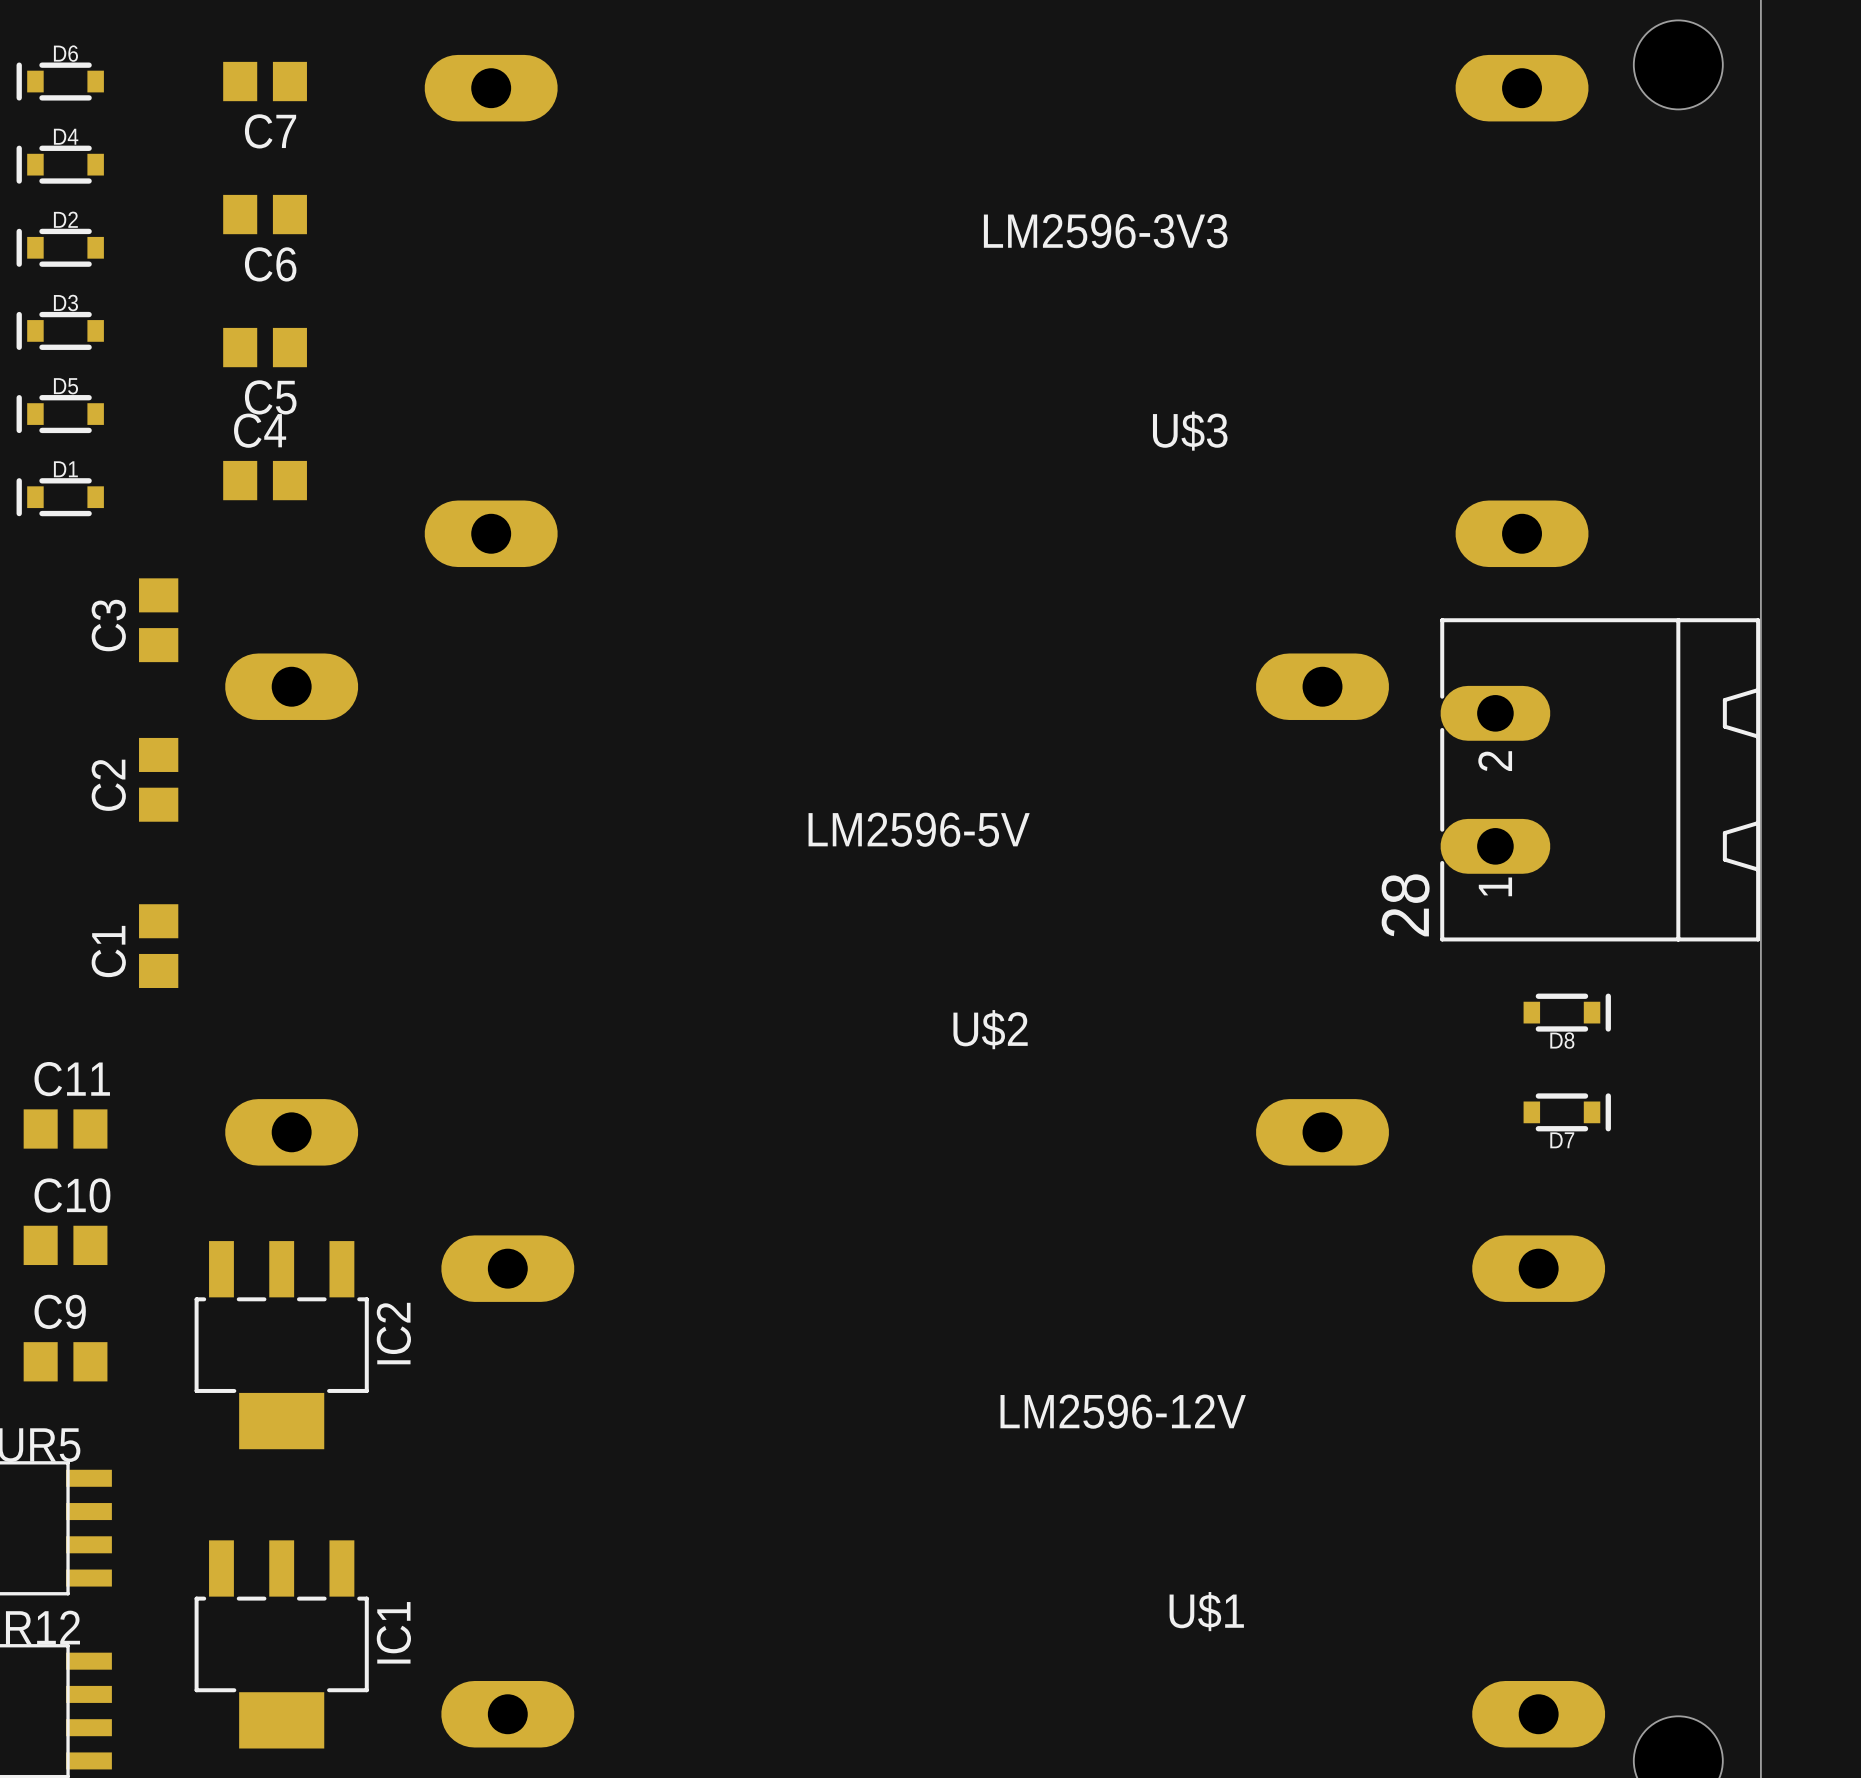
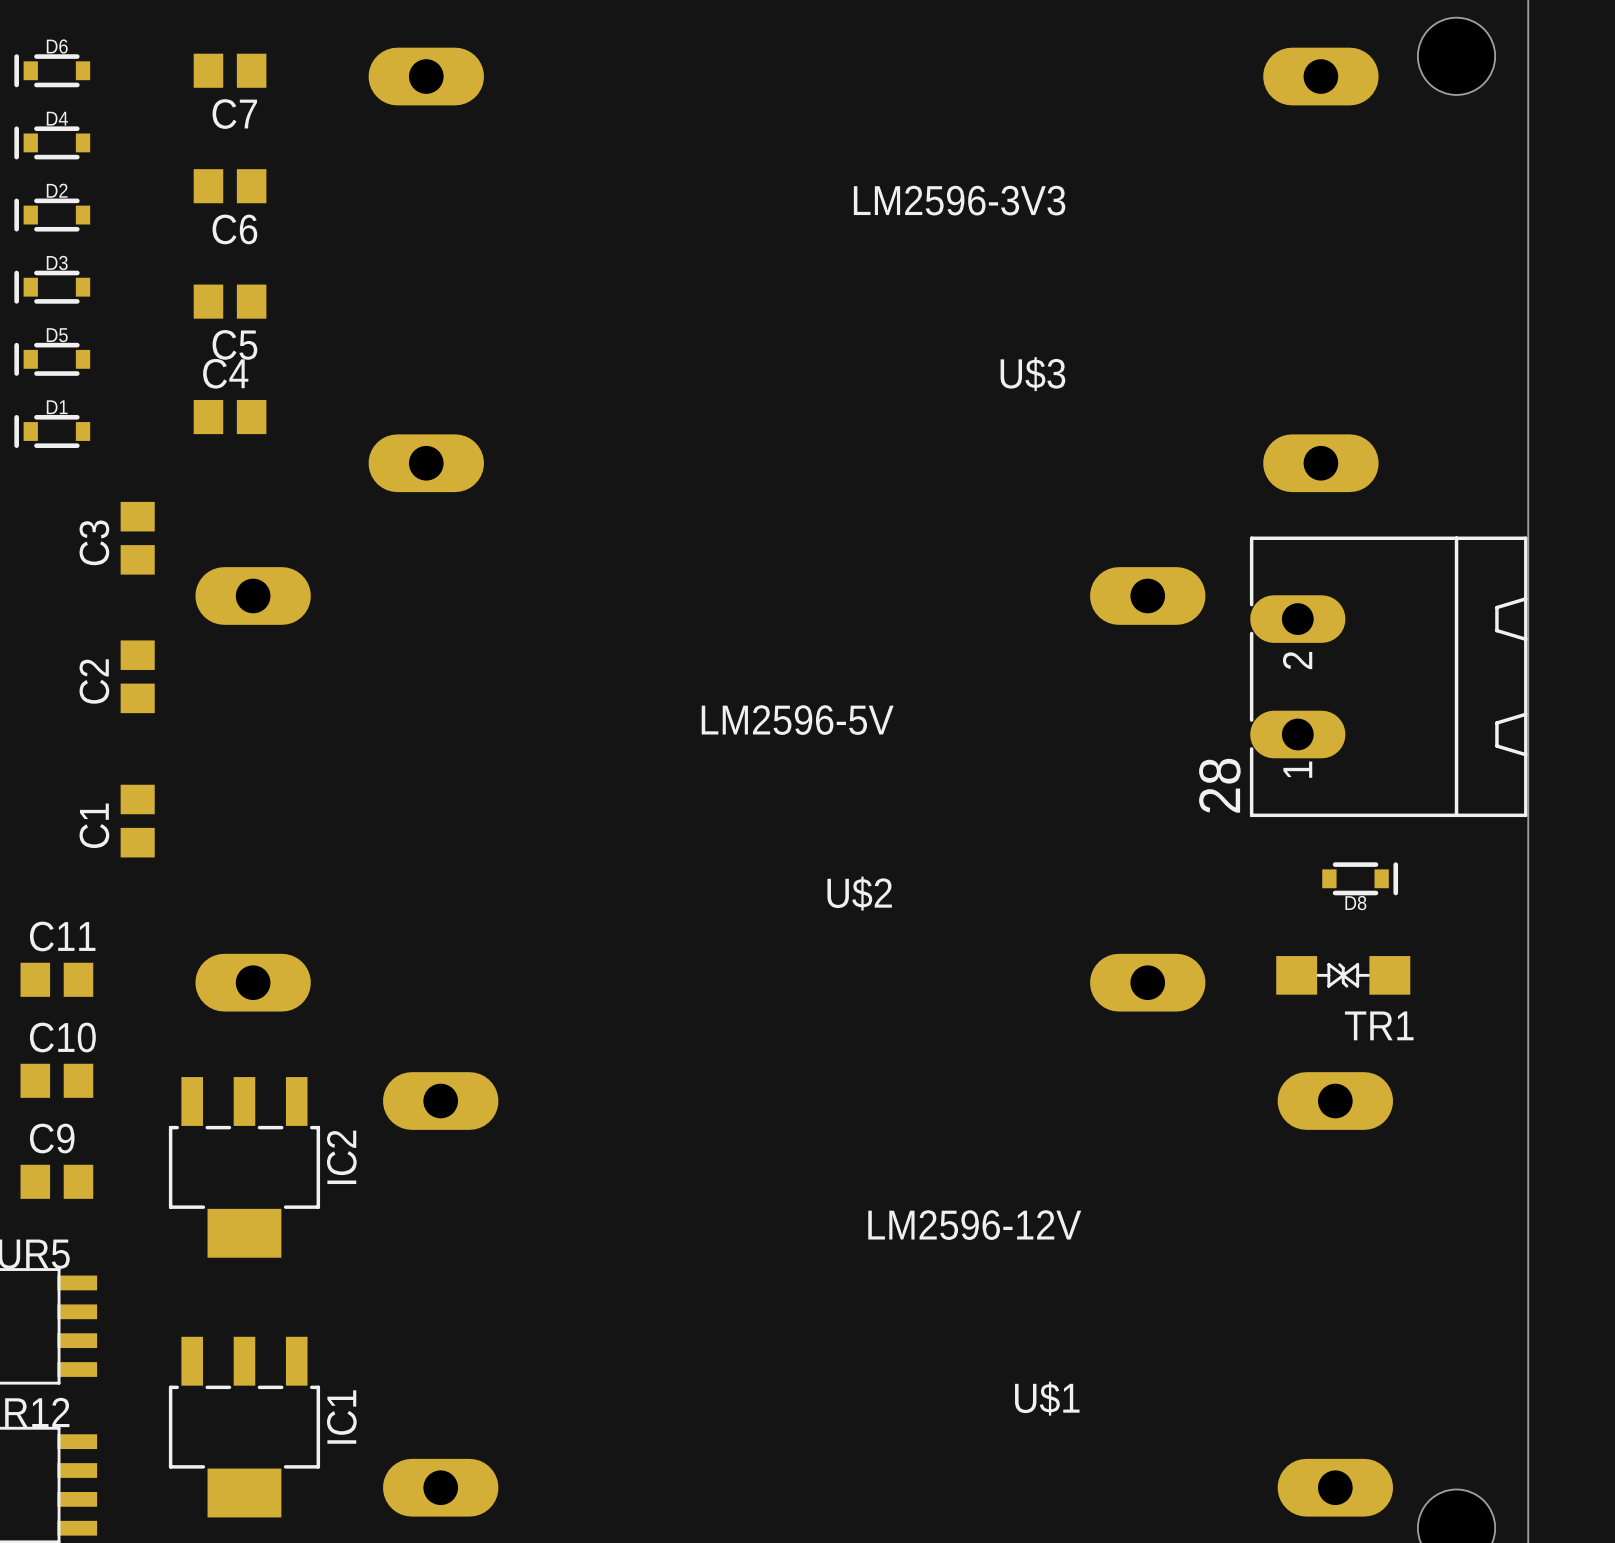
D7: (1567, 1112) -> none
TR1: none -> (1343, 975)

